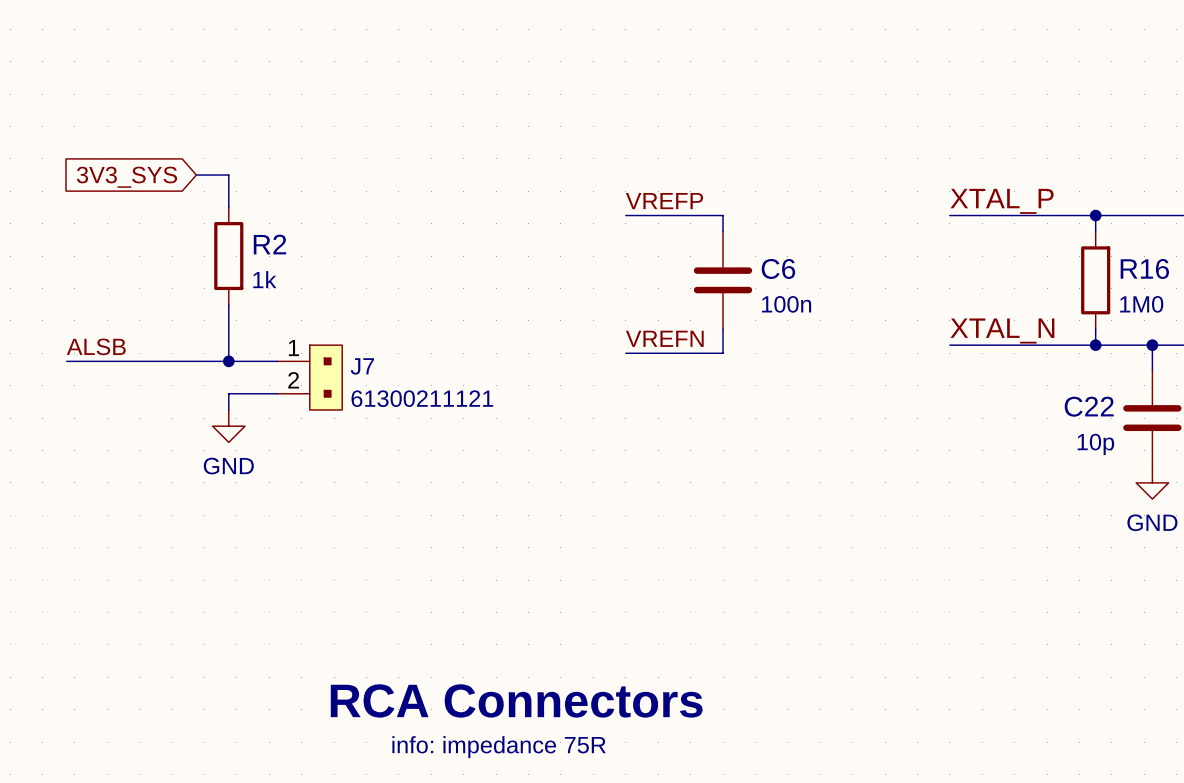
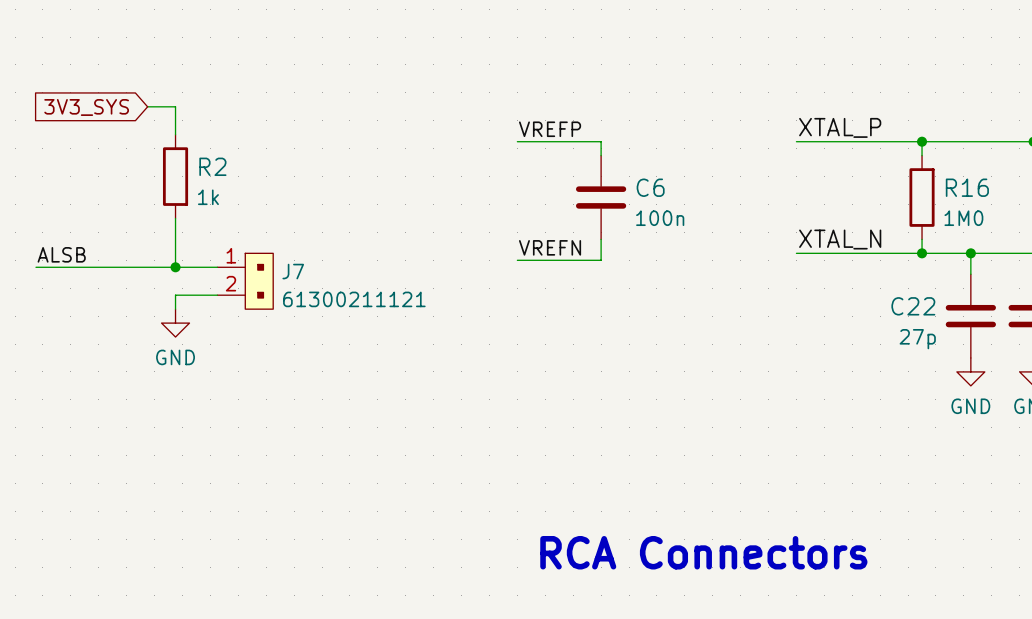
C22 text: 10p (1095, 444) -> 27p (917, 339)
text position: RCA Connectors (516, 700) -> RCA Connectors (703, 552)
text: info: impedance 75R (499, 747) -> none

